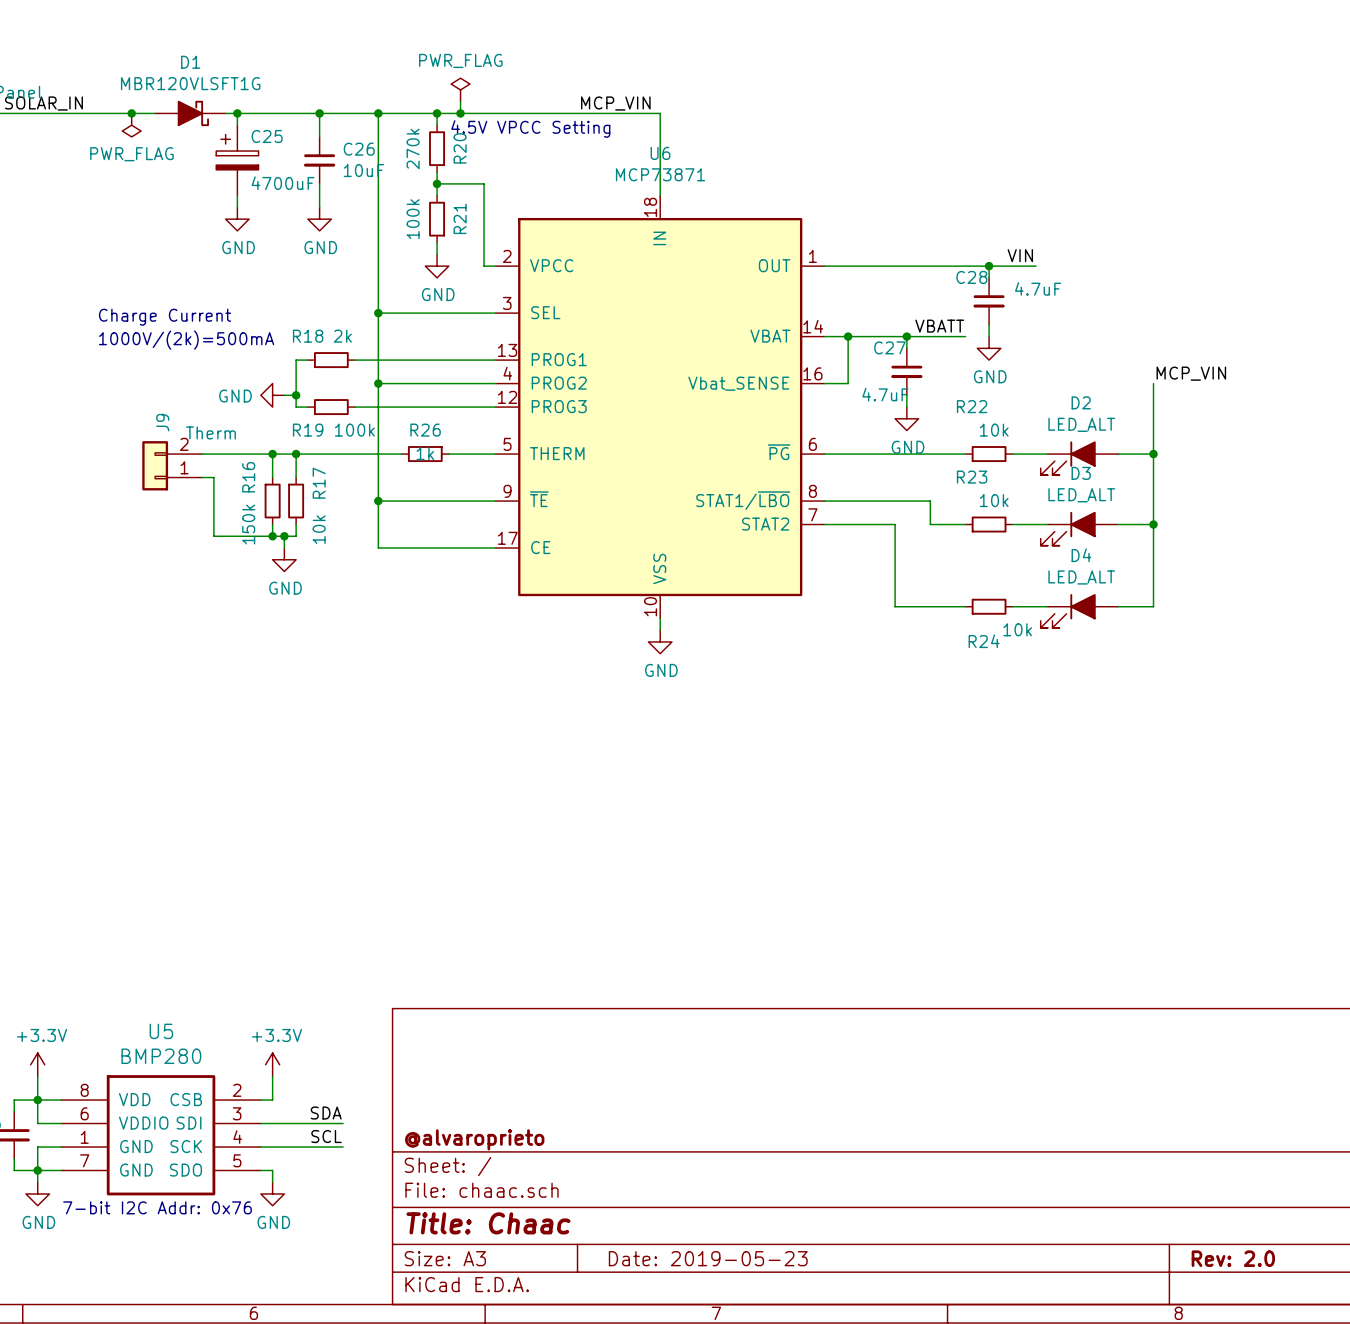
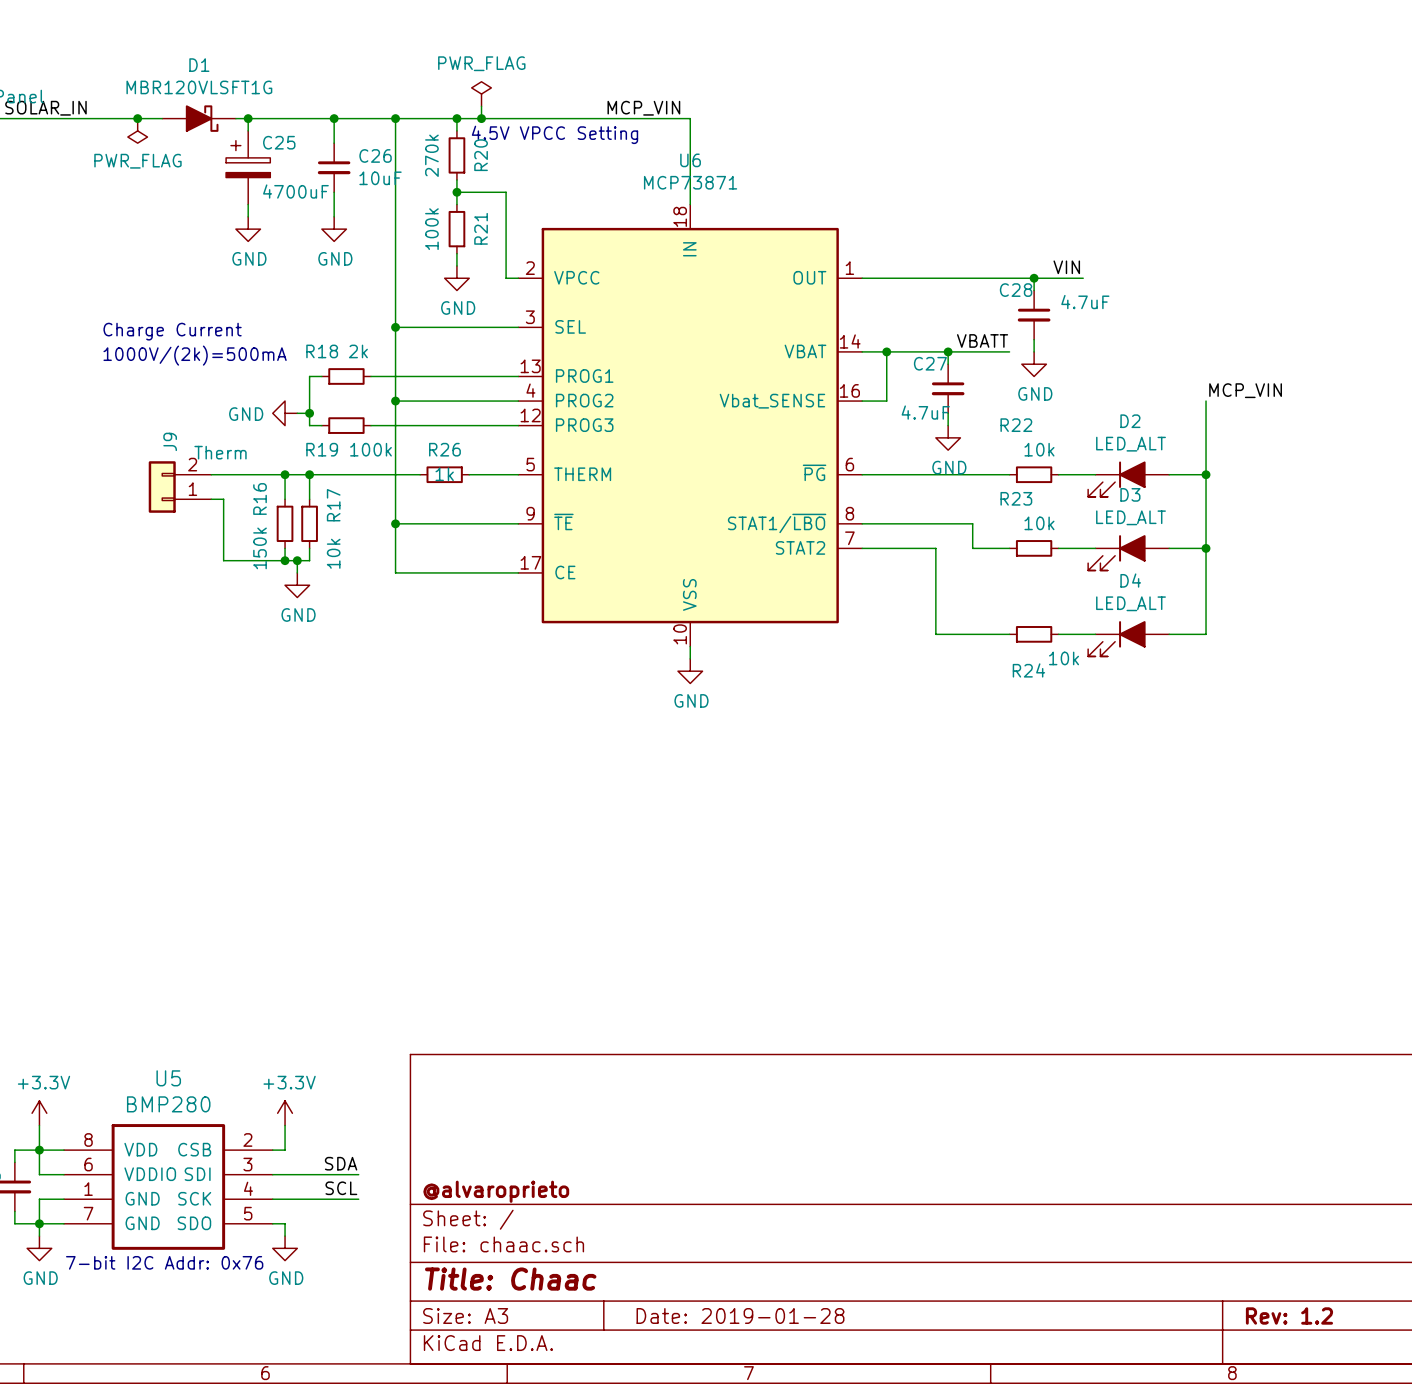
title block: Date: 2019-05-23 (708, 1258) -> Date: 2019-01-28 (740, 1315)
title block: Rev: 2.0 (1233, 1258) -> Rev: 1.2 (1289, 1315)

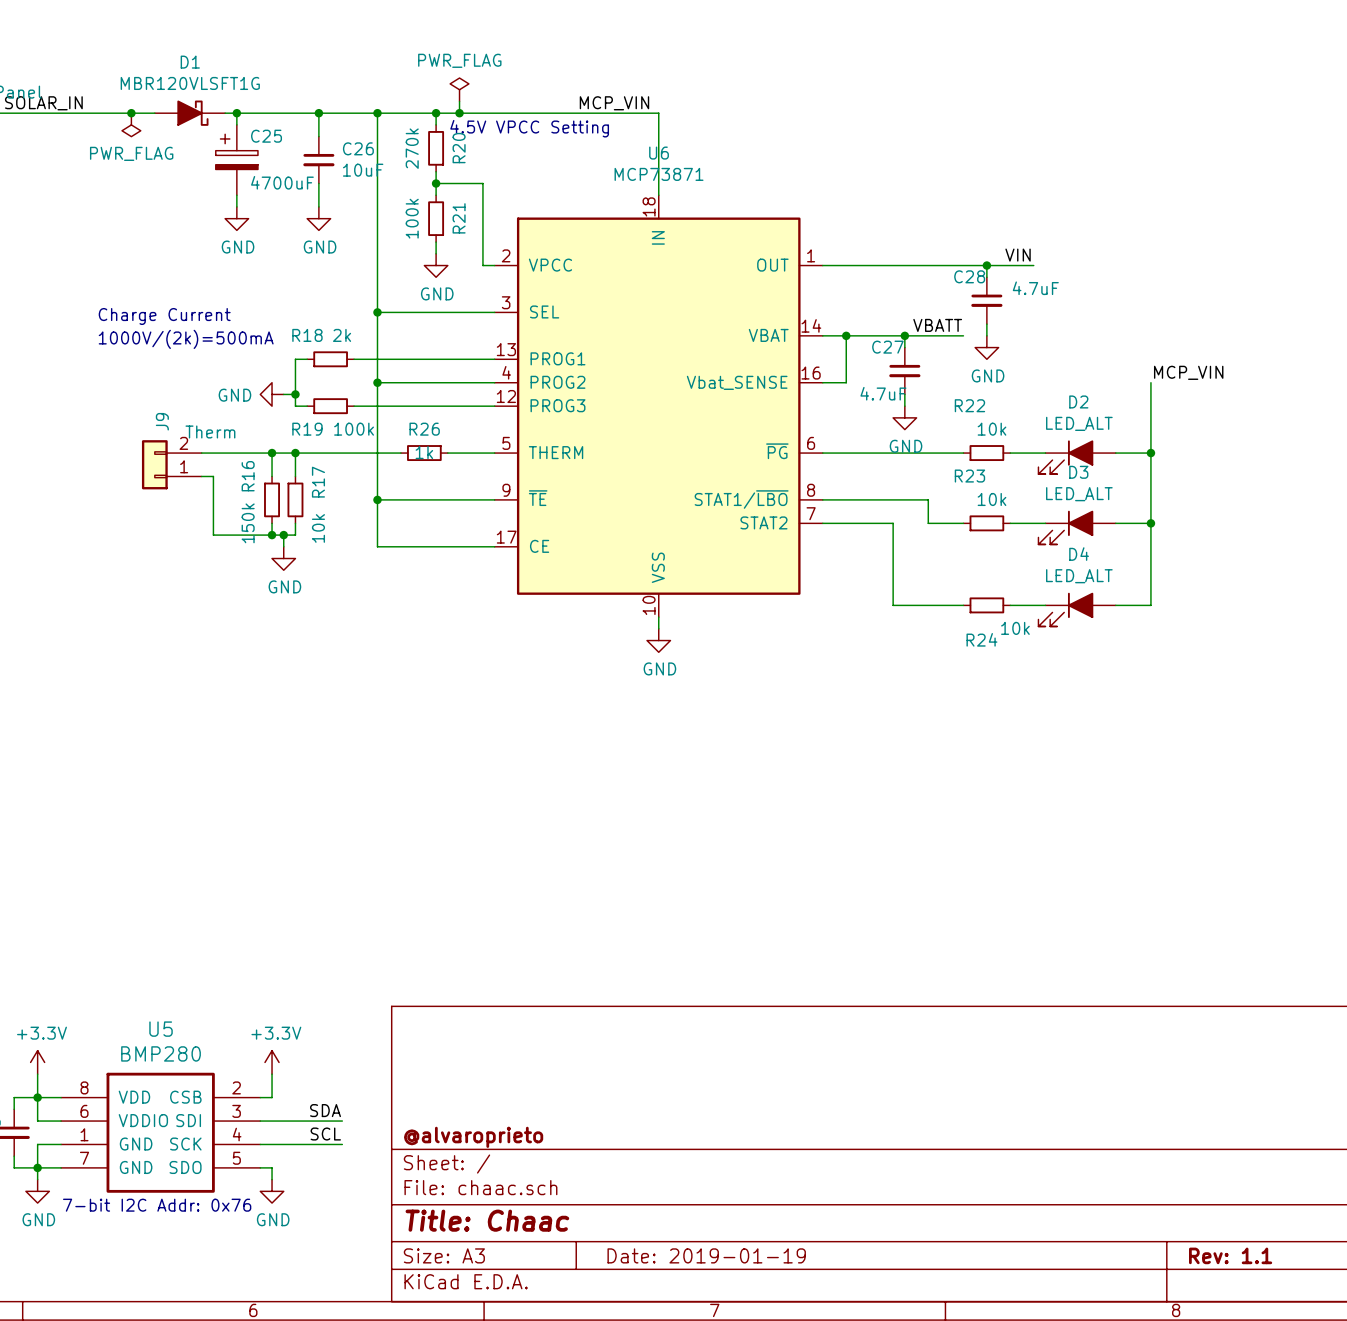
title block: Date: 2019-01-28 (740, 1315) -> Date: 2019-01-19 (706, 1255)
title block: Rev: 1.2 (1289, 1315) -> Rev: 1.1 (1230, 1255)

